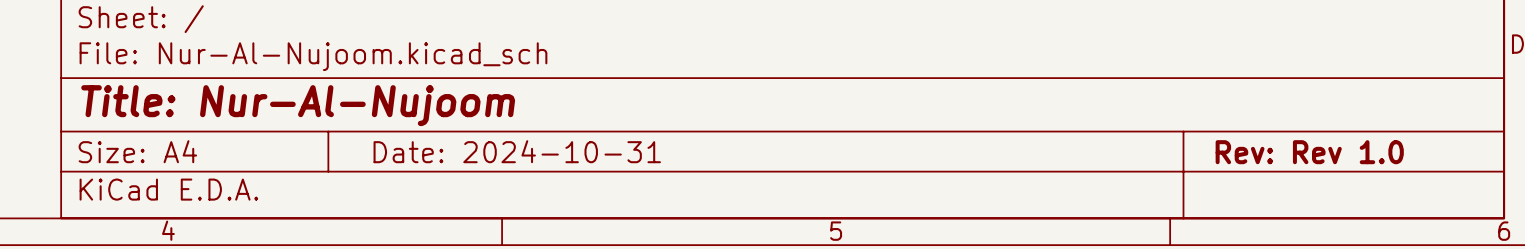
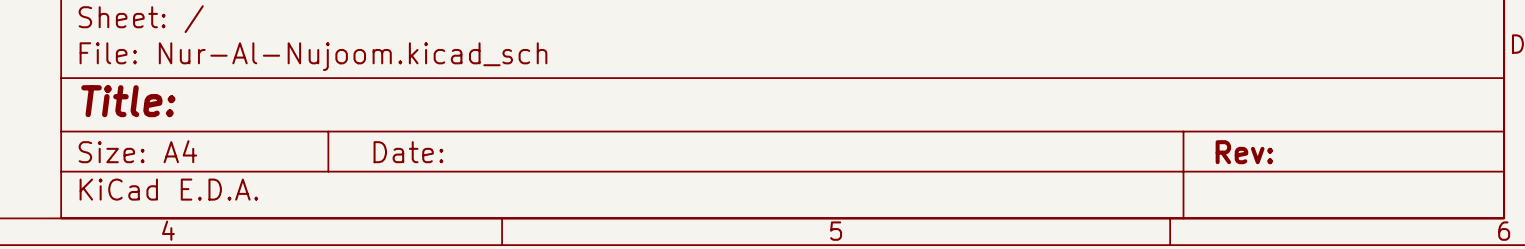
title block: Title: Nur-Al-Nujoom (298, 105) -> Title: (128, 101)
title block: Date: 2024-10-31 (517, 151) -> Date: (408, 152)
title block: Rev: Rev 1.0 (1309, 152) -> Rev: (1244, 152)

